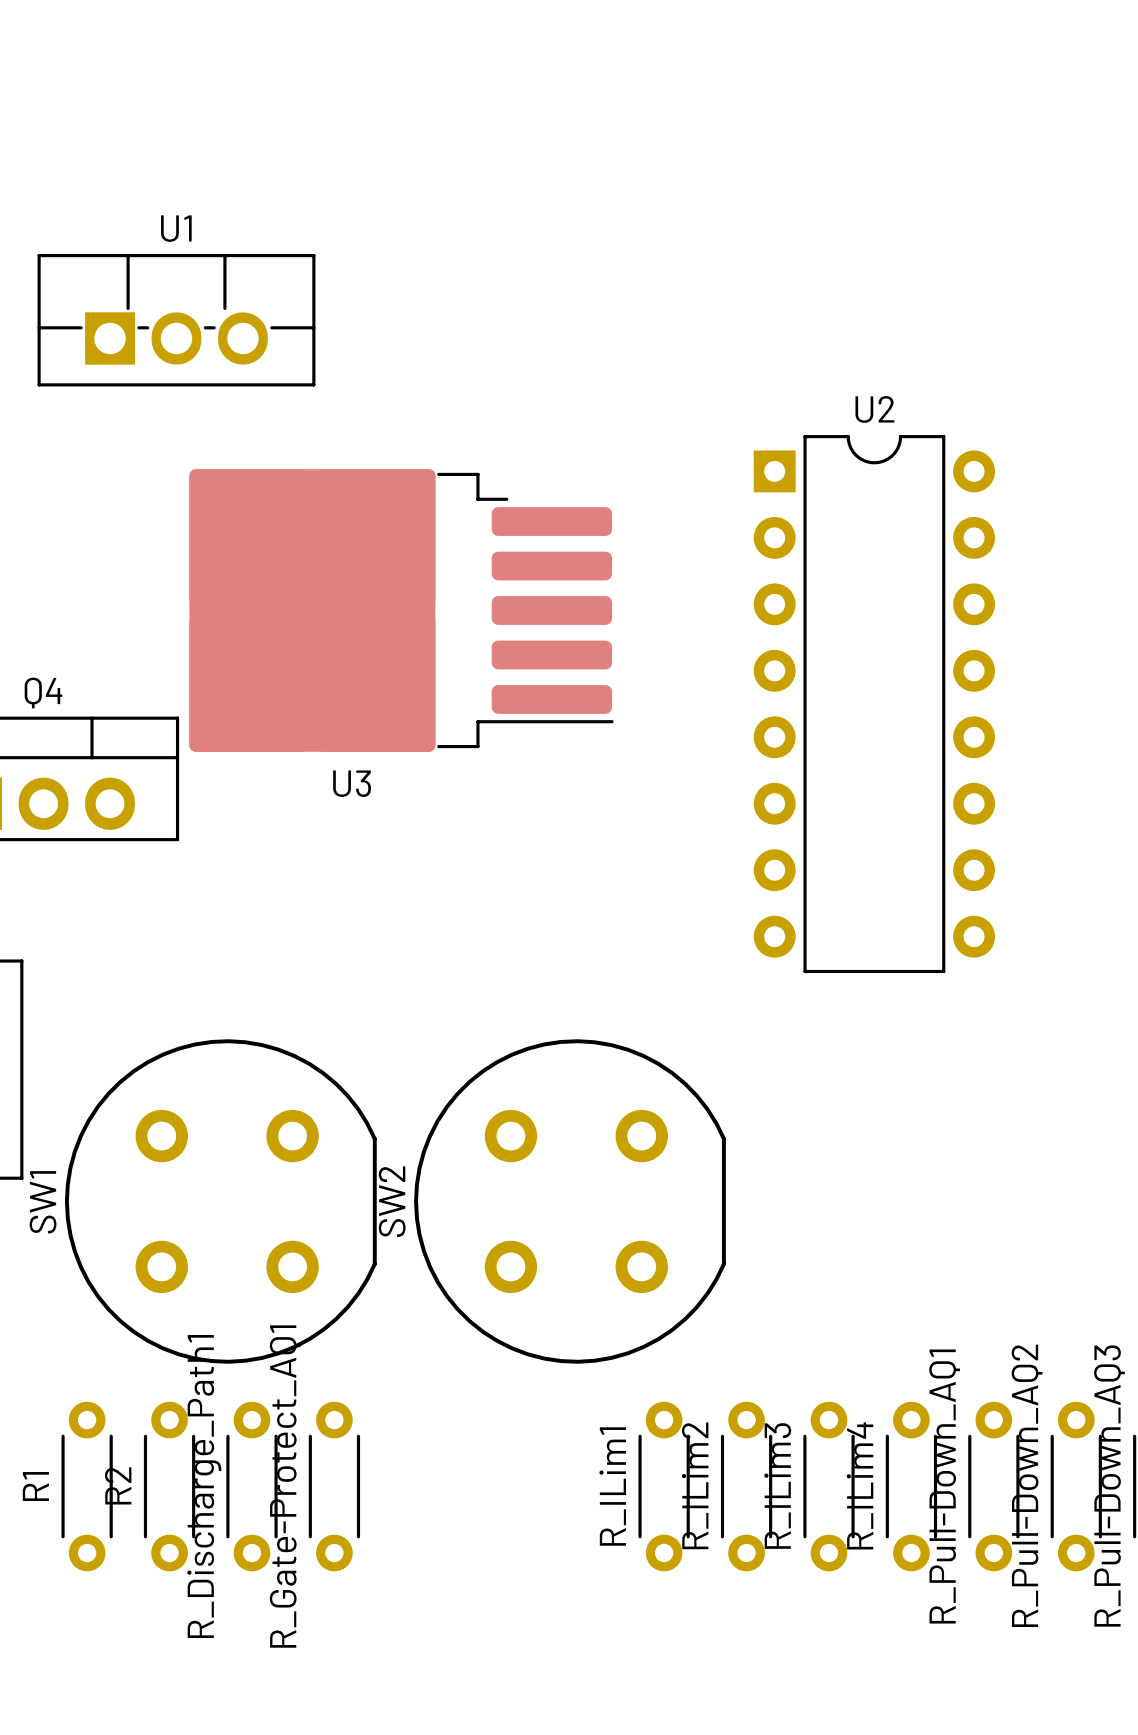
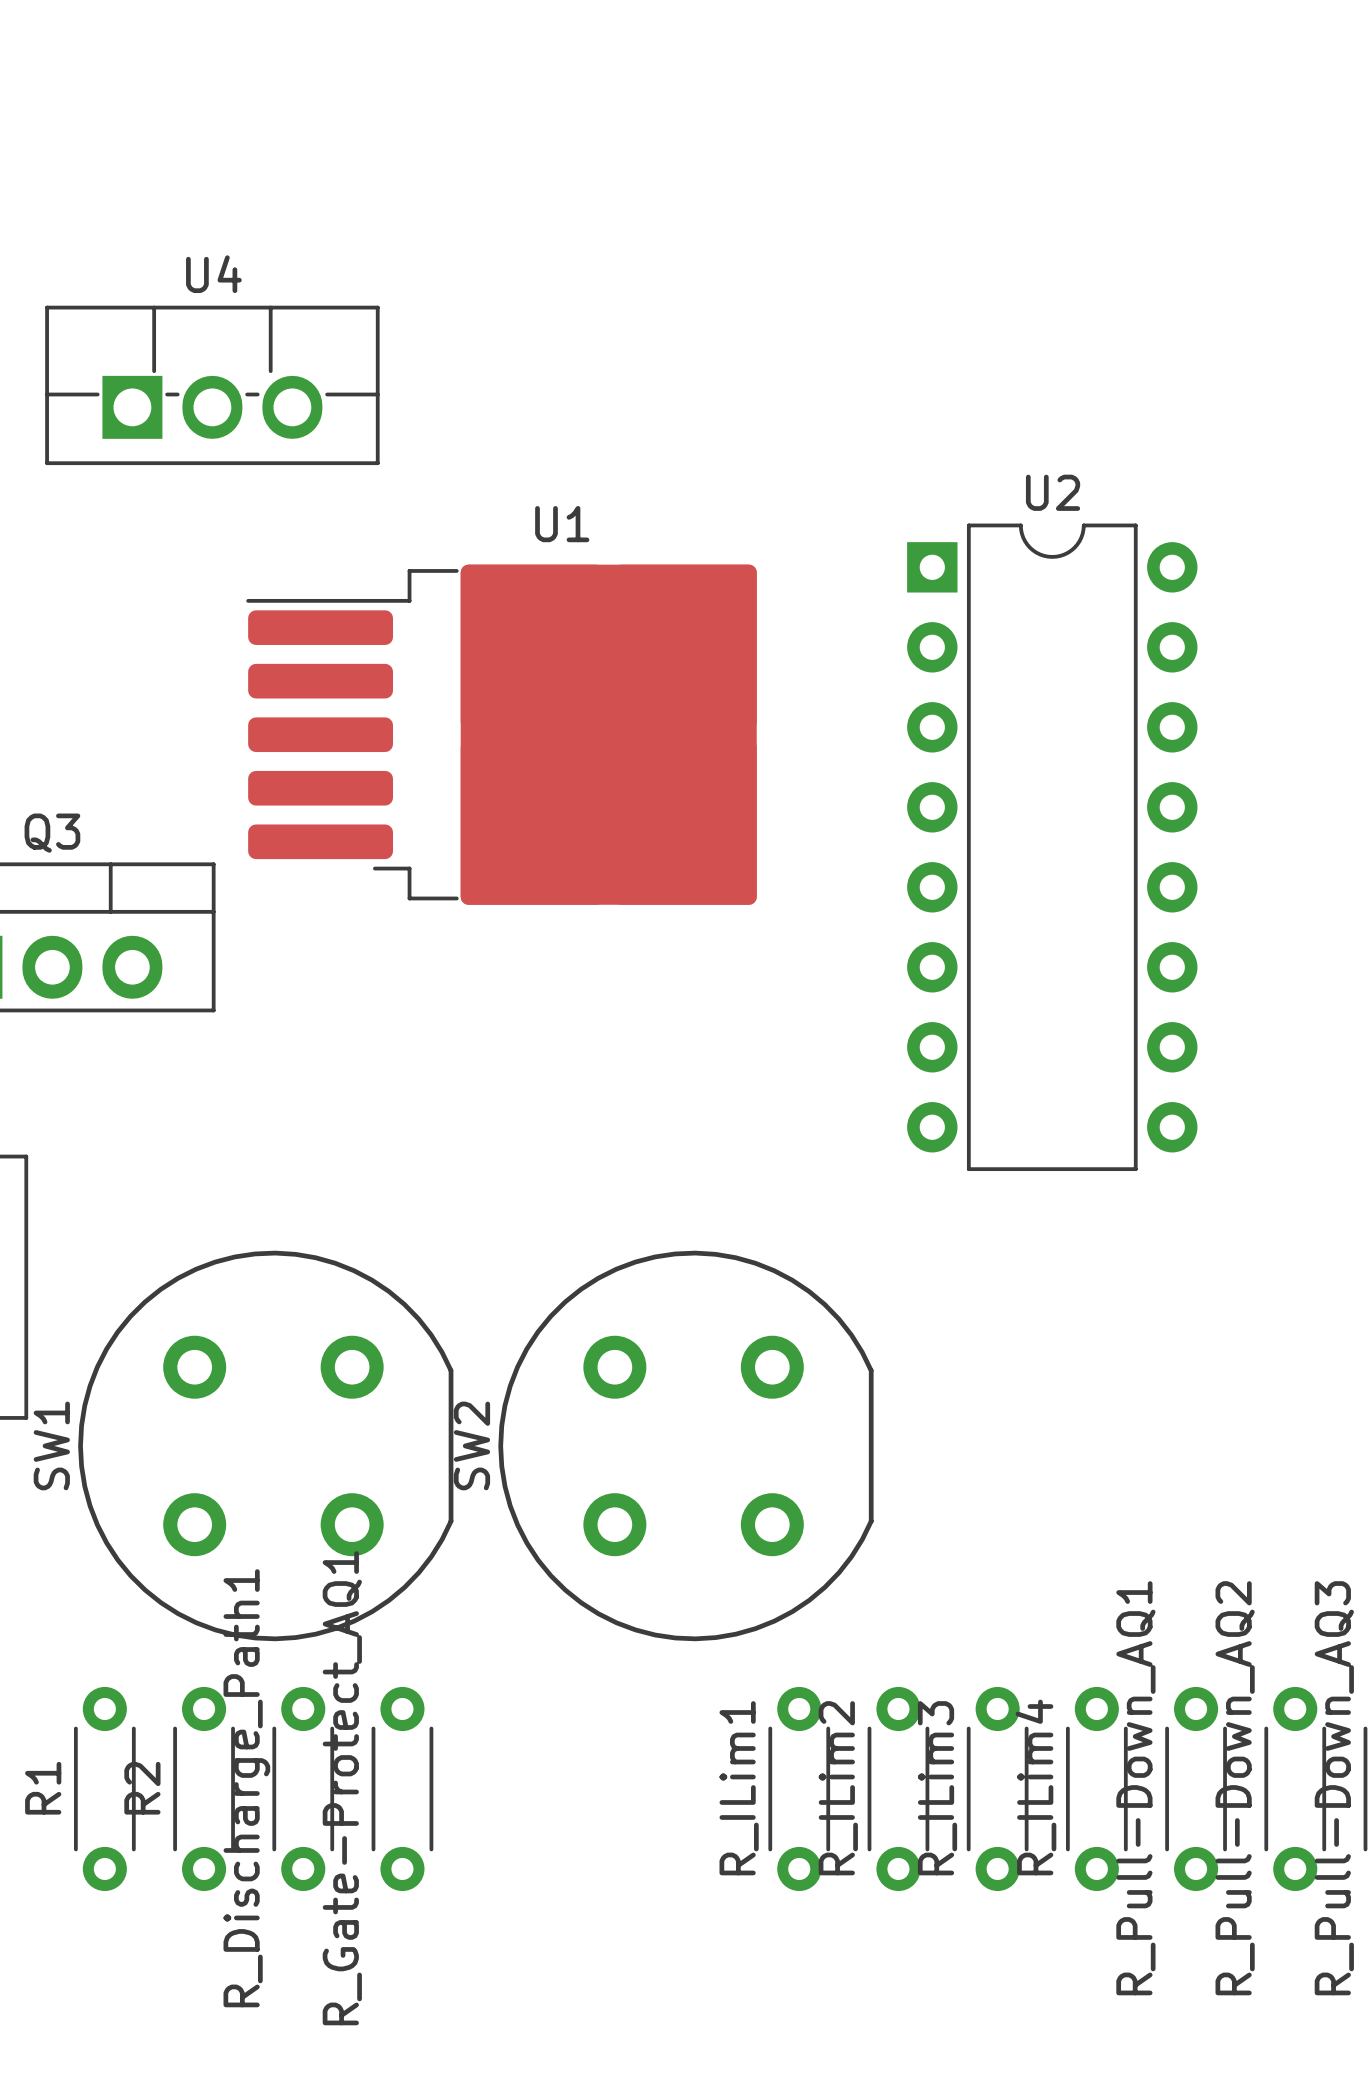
U1 name: U1 (176, 228) -> U4 (213, 274)
U3: (401, 610) -> none
U1: none -> (501, 734)
Q4 name: Q4 (43, 693) -> Q3 (52, 833)

